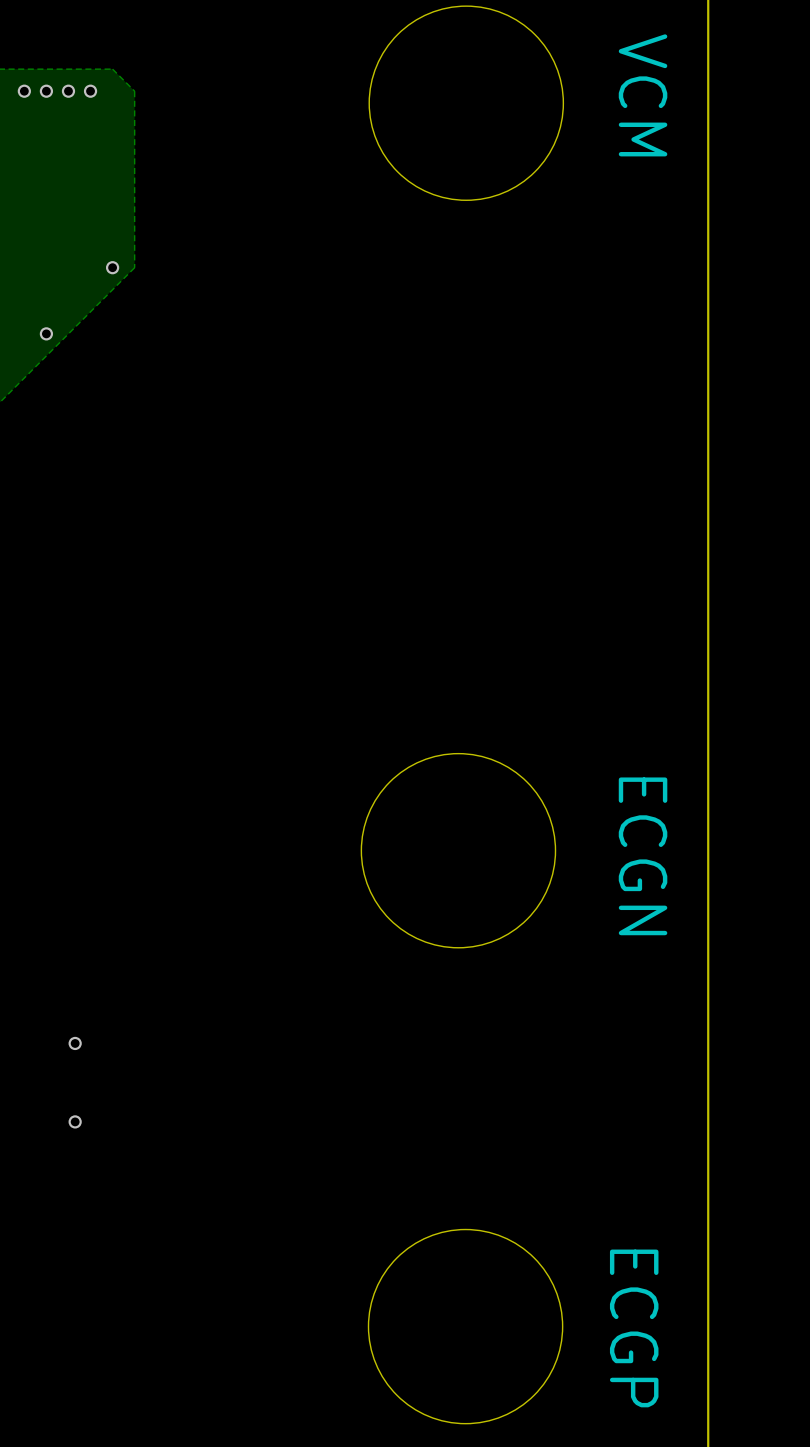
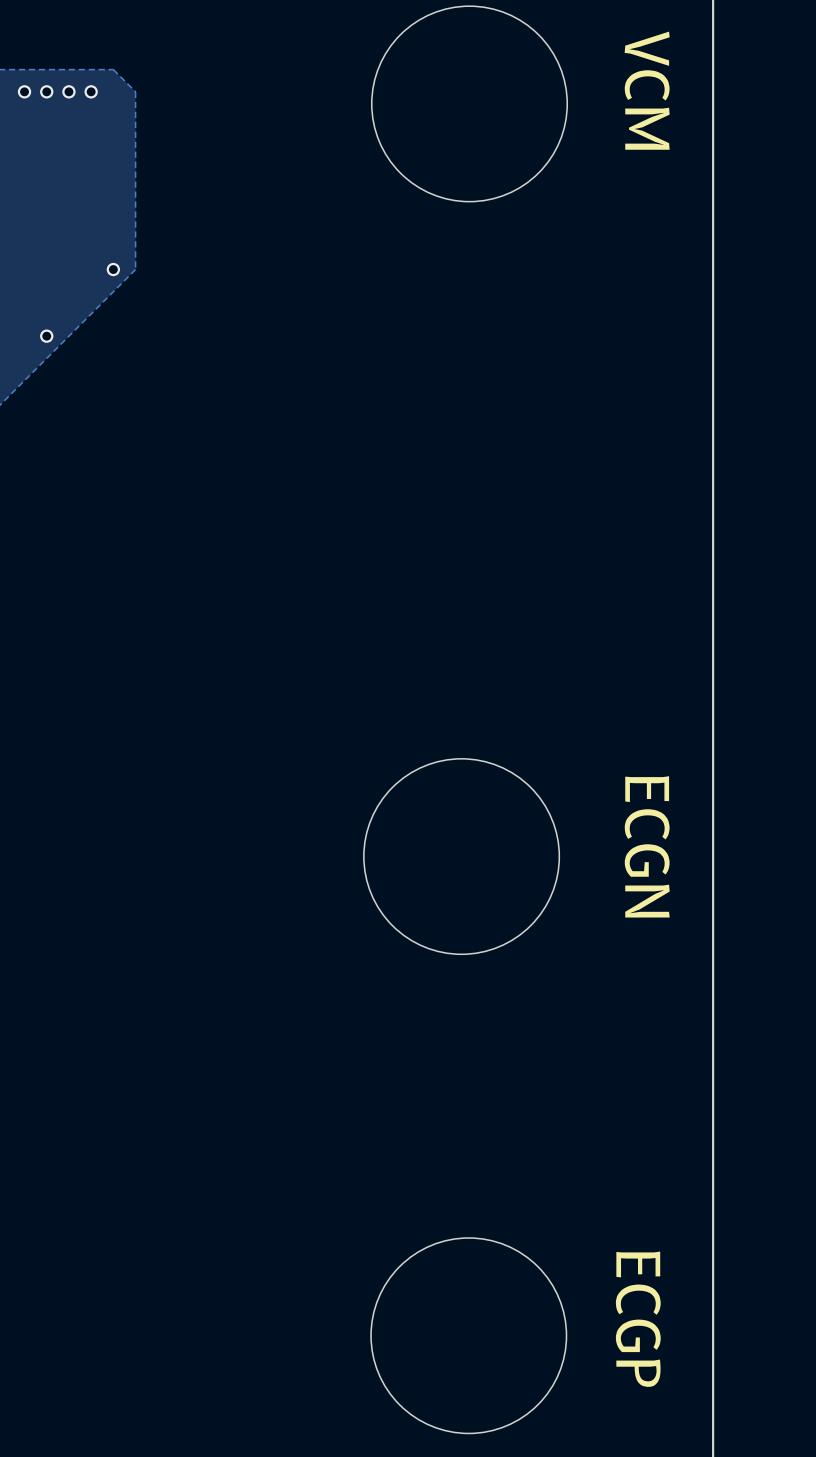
via: (75, 1043) -> none
via: (75, 1121) -> none

